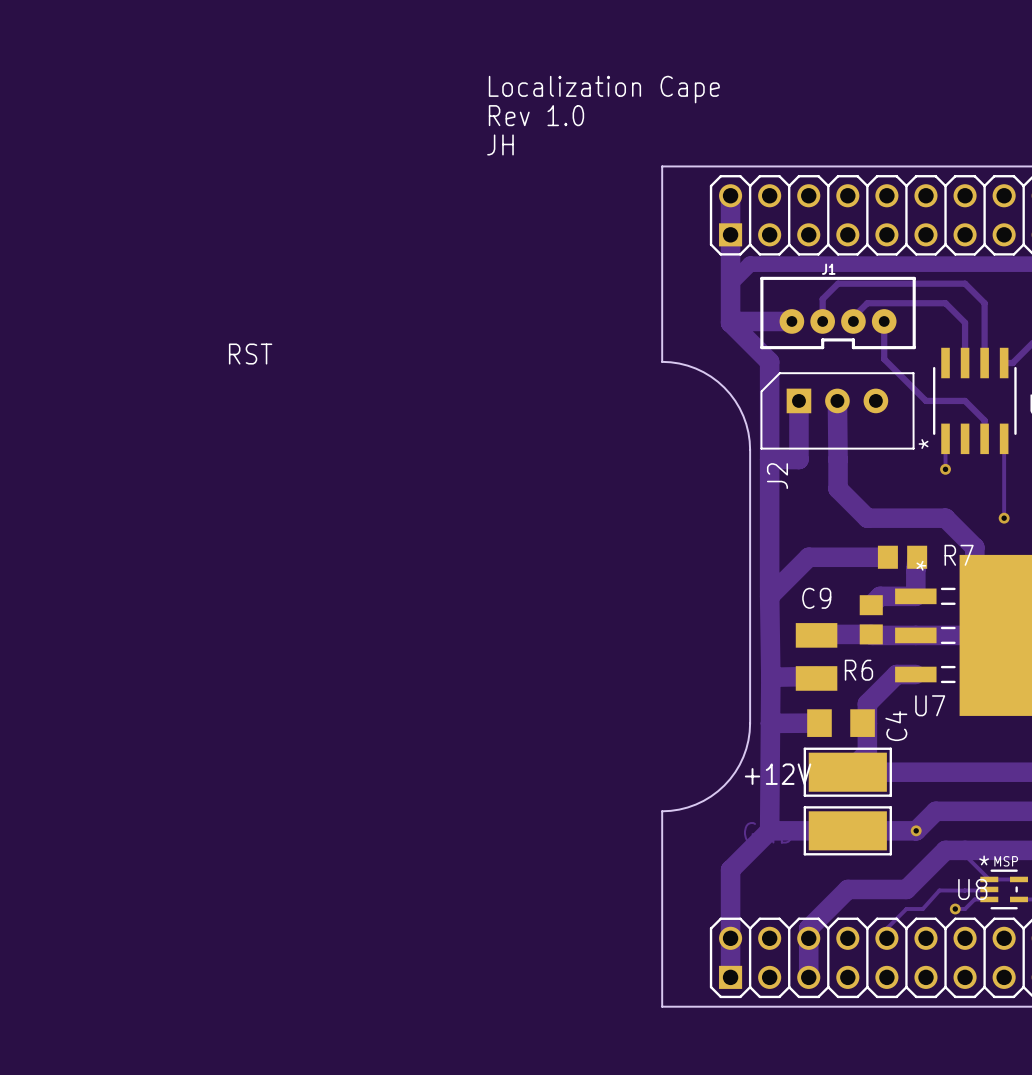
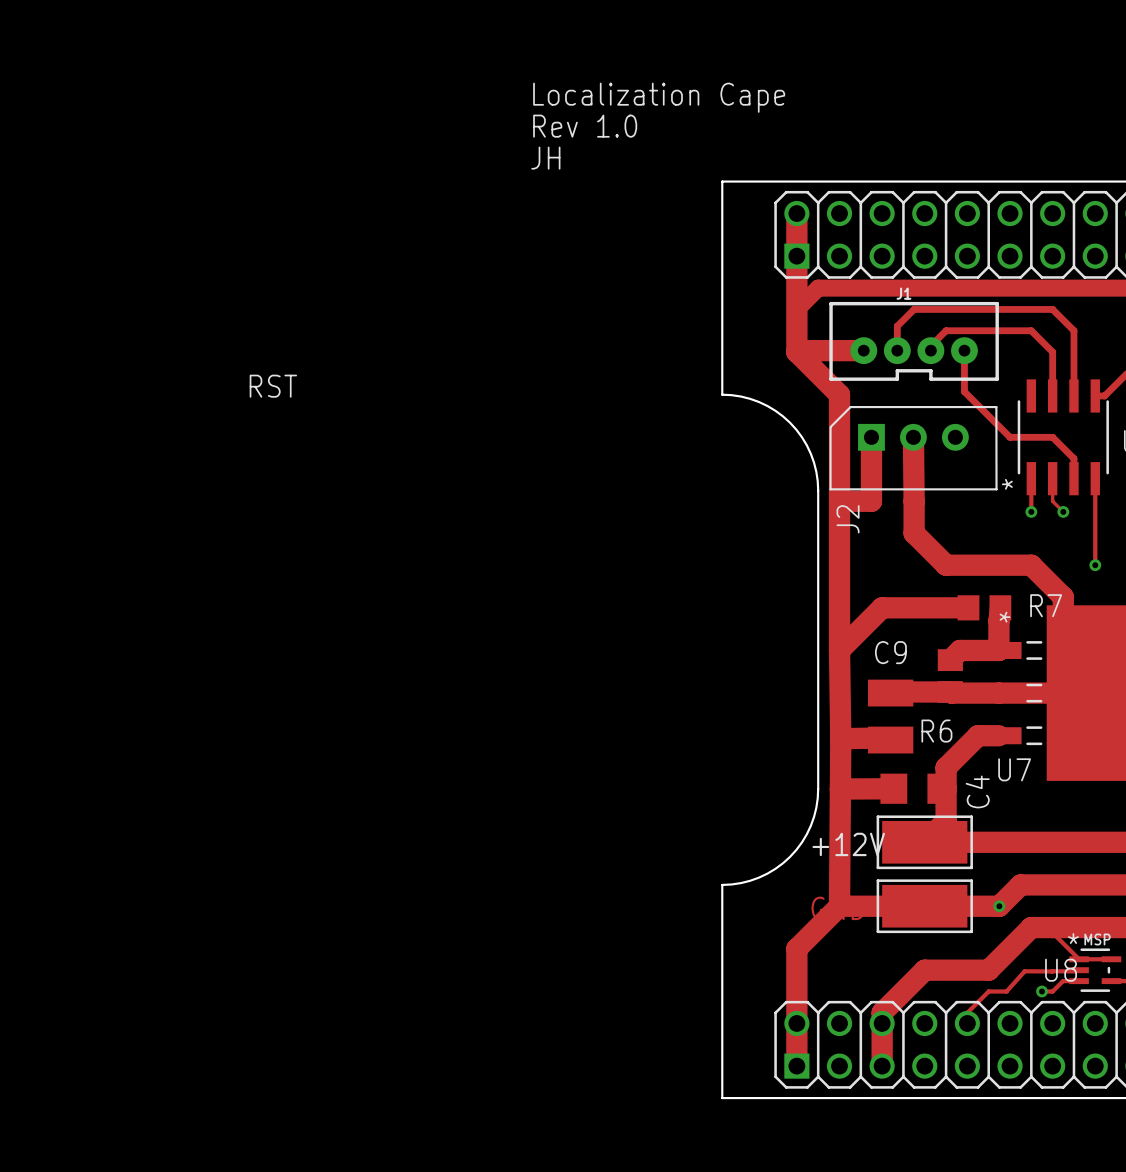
track: none -> (1052, 478) (1052, 501) (1063, 511)
via: none -> (1063, 511)

